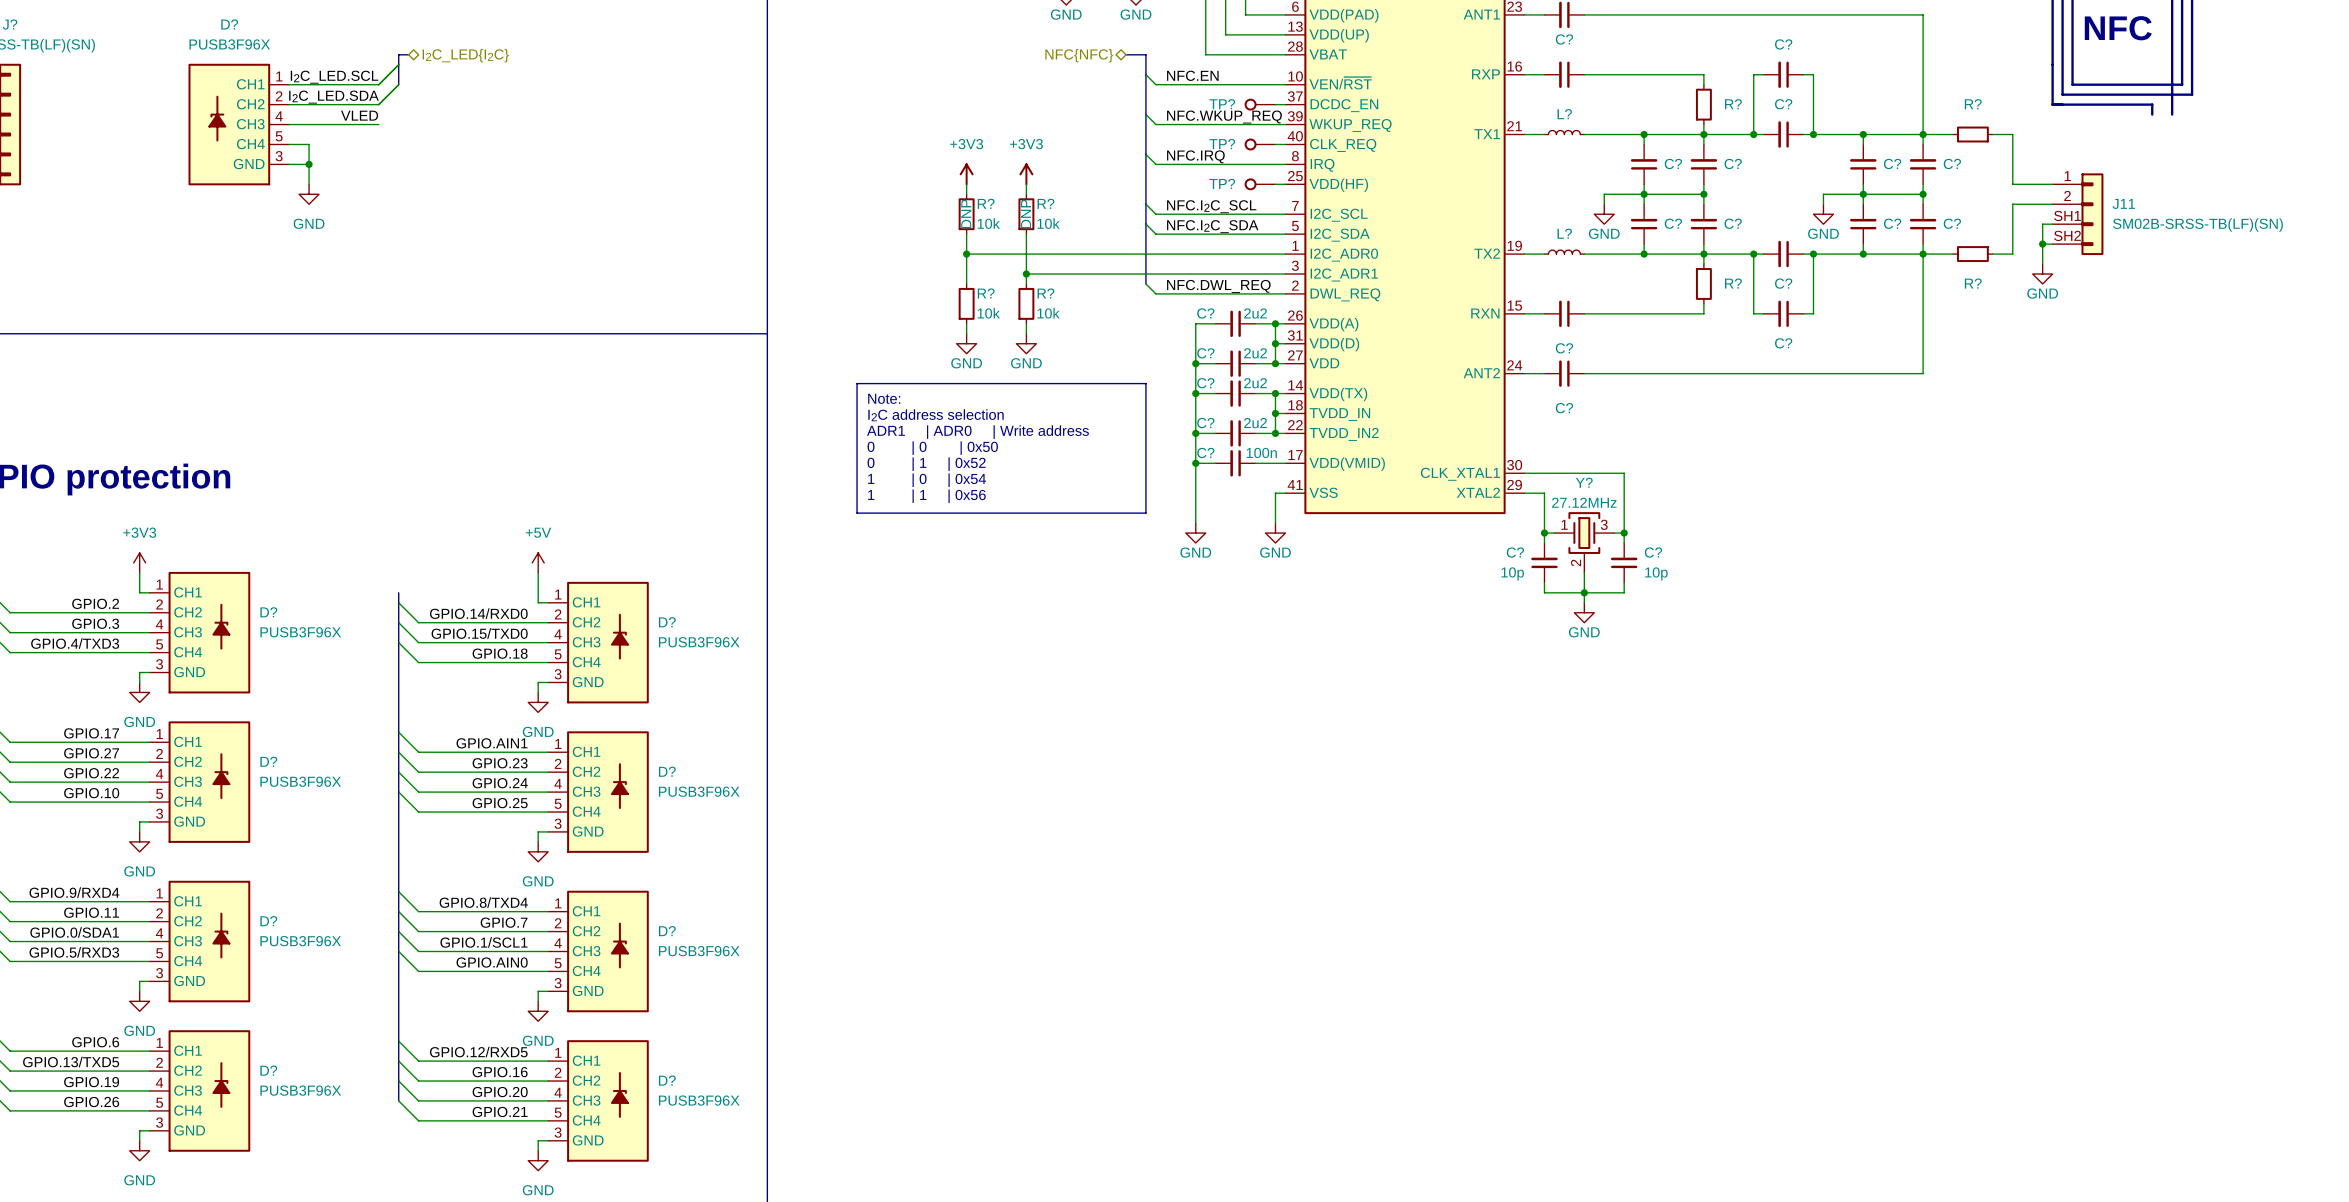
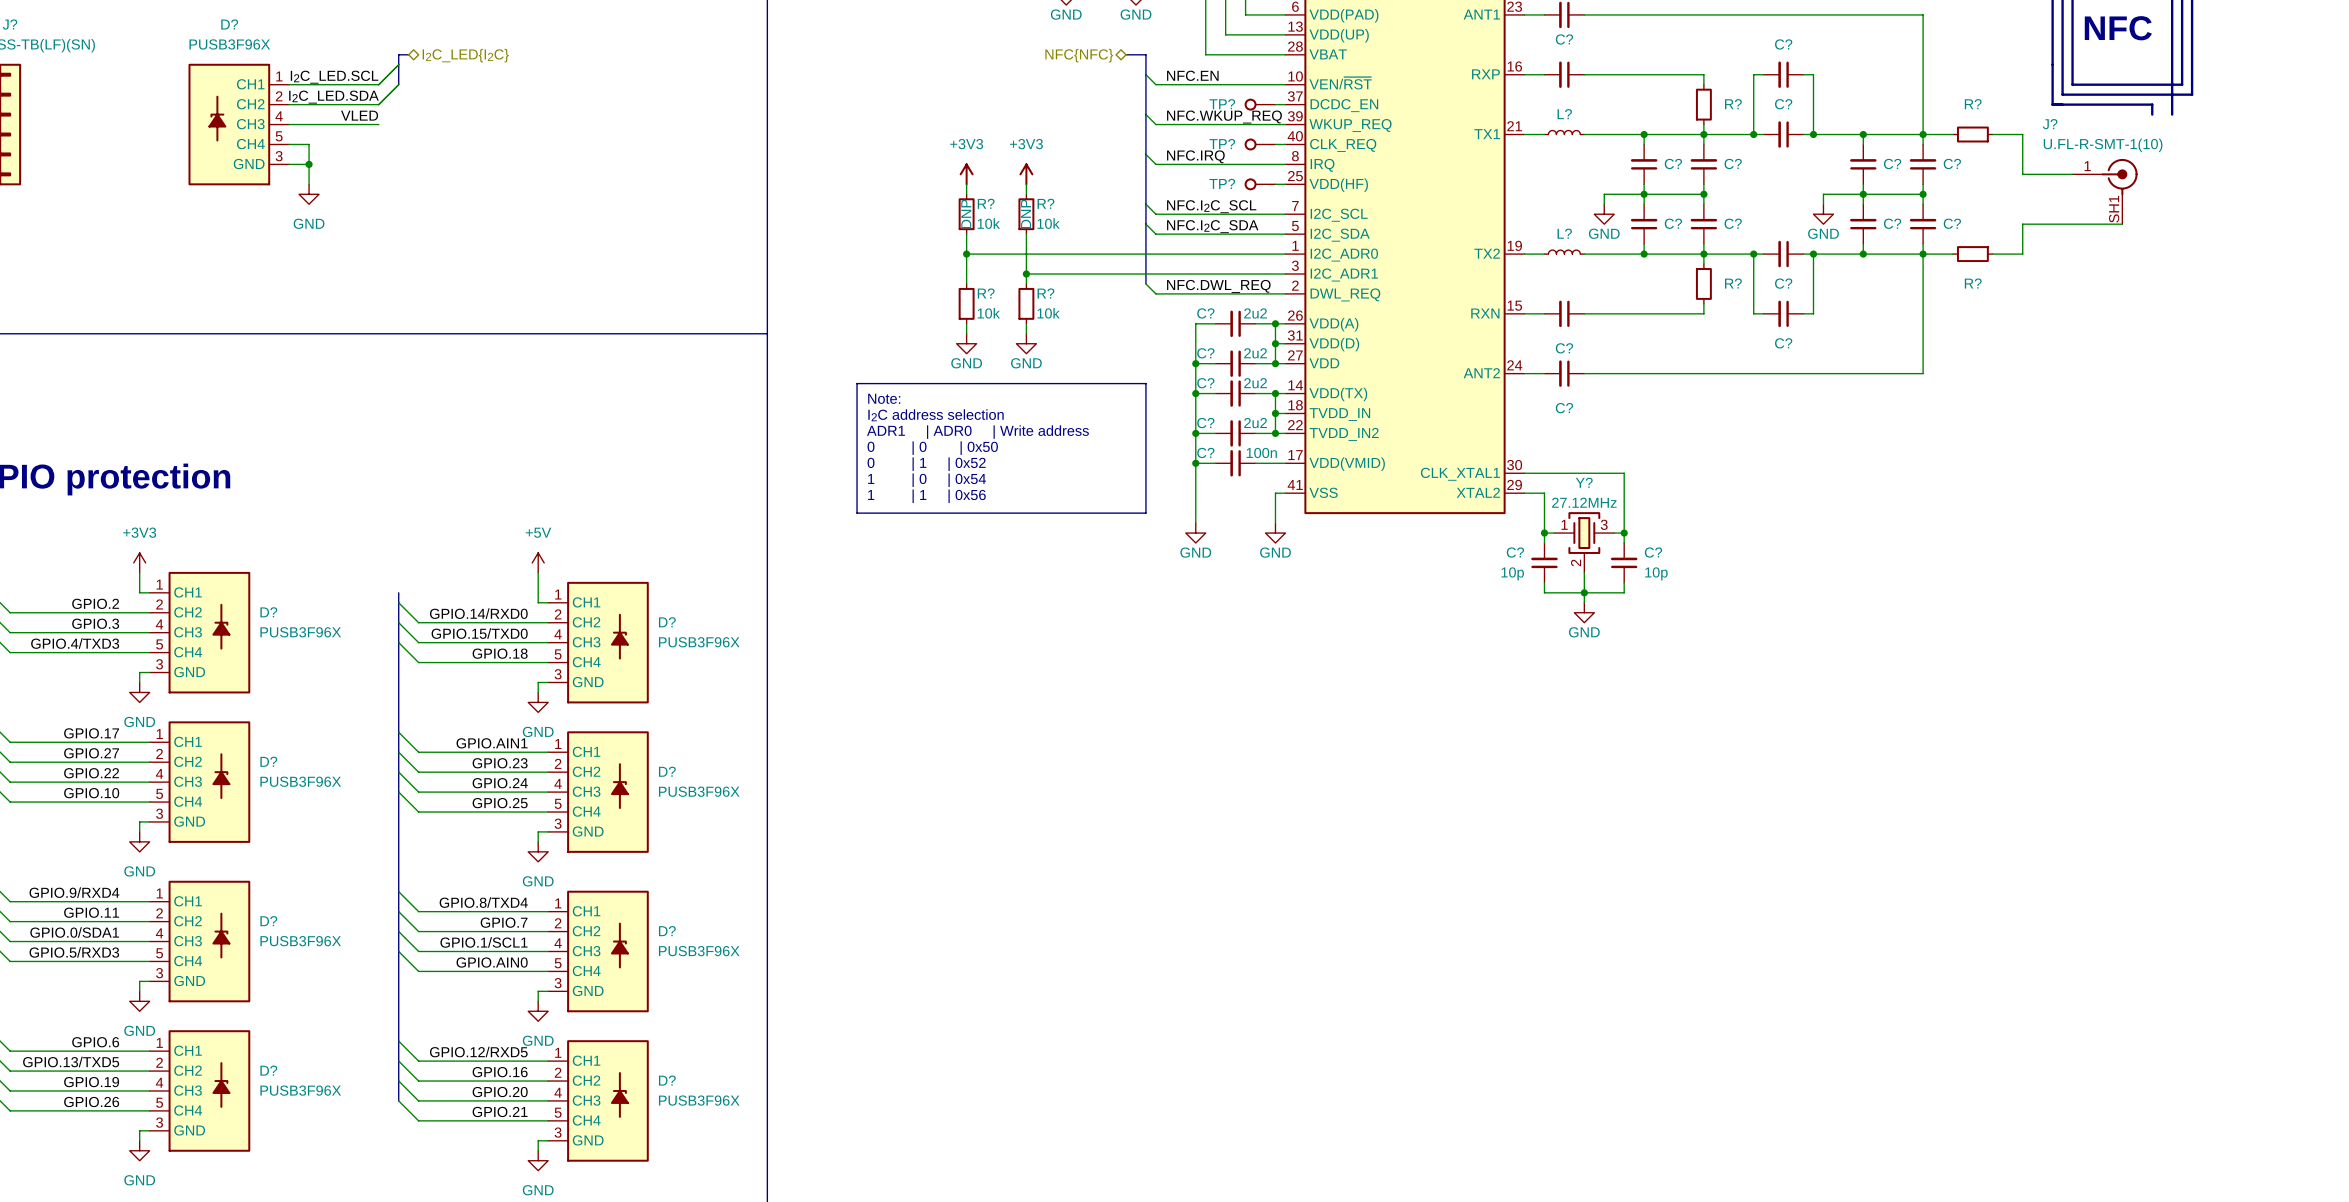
wire: (2012, 134) (2012, 184) (2052, 184) -> (2012, 134) (2022, 134) (2022, 174) (2072, 174)
J?: none -> (2105, 191)
wire: (2052, 204) (2012, 204) (2012, 254) -> (2042, 224) (2022, 224) (2022, 254) (2012, 254)
J11: (2078, 214) -> none
wire: (2042, 224) (2042, 264) -> none
wire: (2042, 244) (2052, 244) -> none
junction: (2042, 244) -> none
power symbol: GND (2042, 274) -> none

